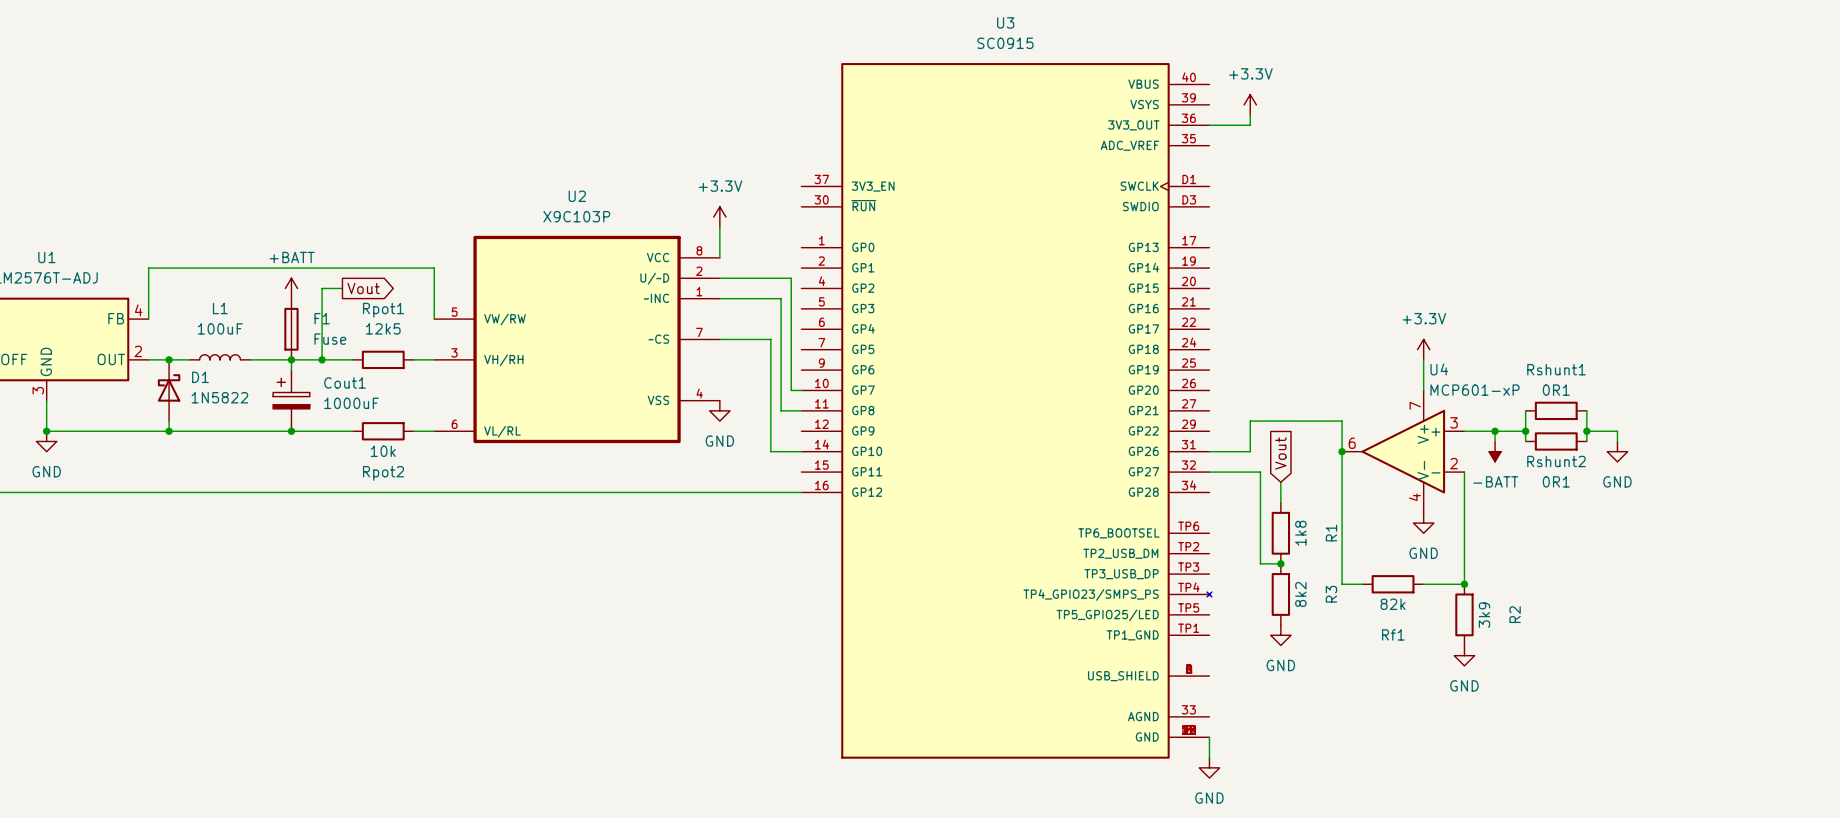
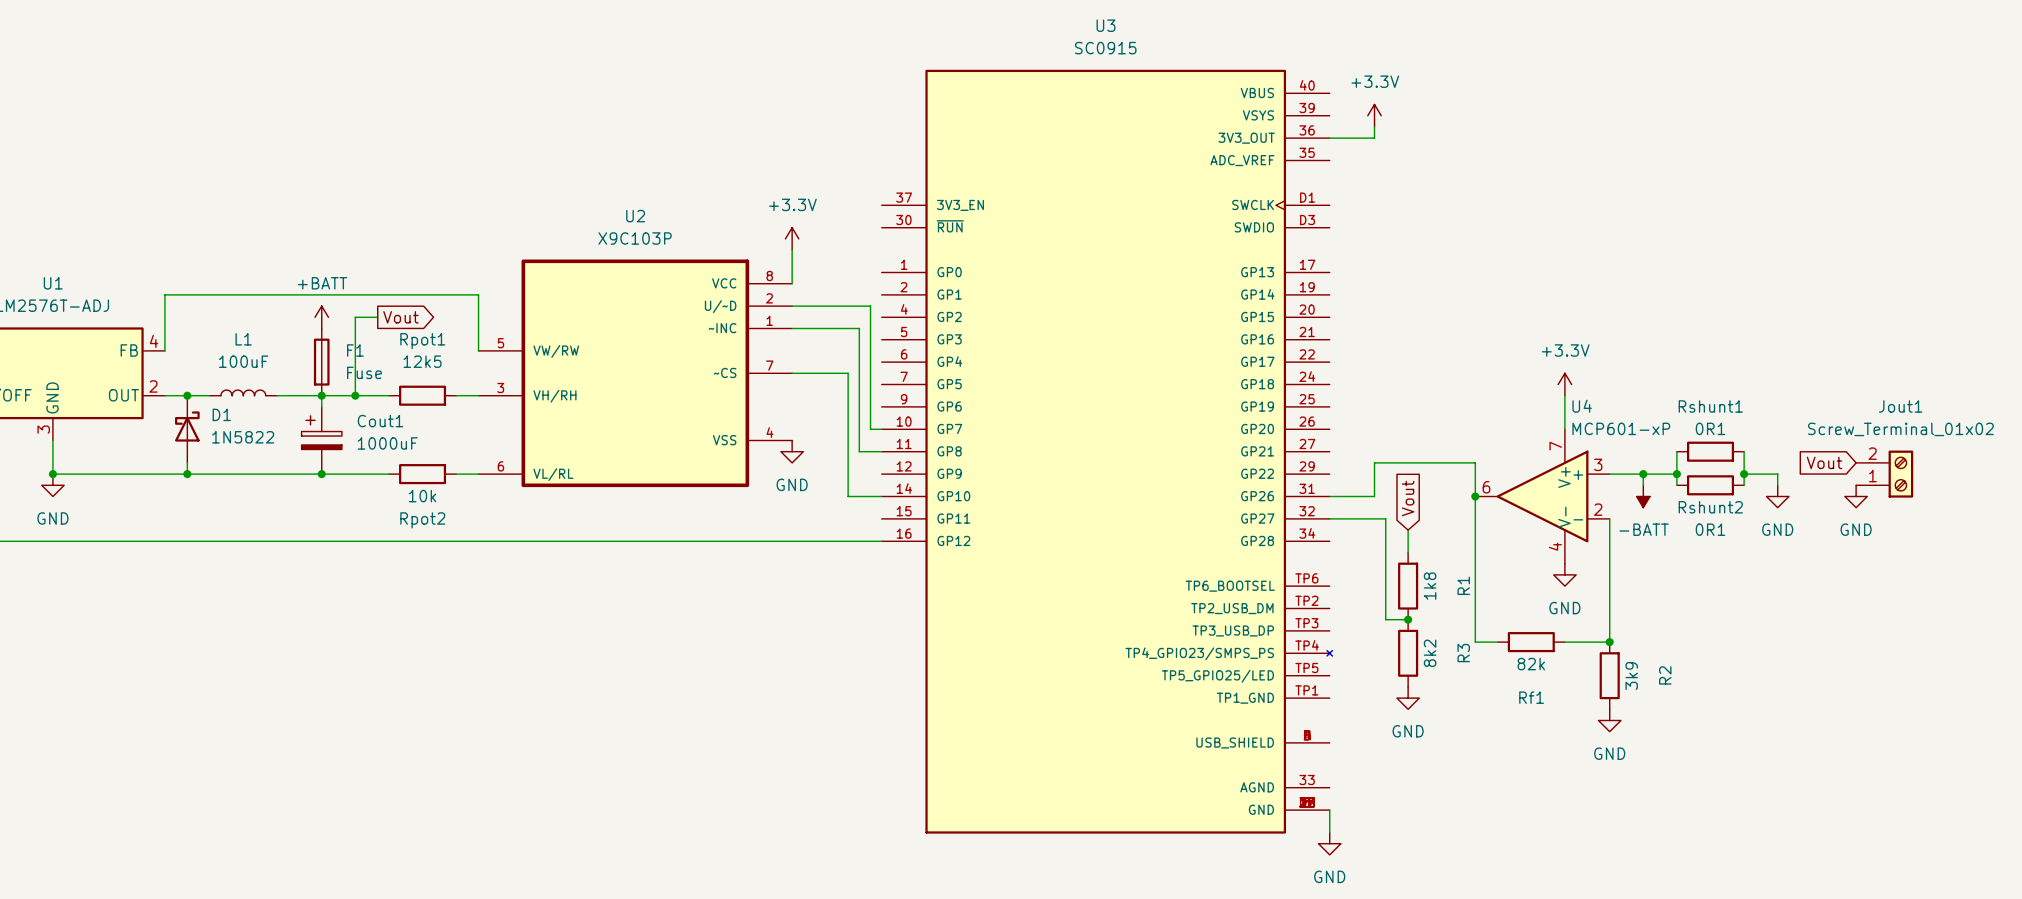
global label: none -> Vout (1824, 462)
Jout1: none -> Screw_Terminal_01x02 (1884, 474)
power symbol: none -> GND (1856, 496)

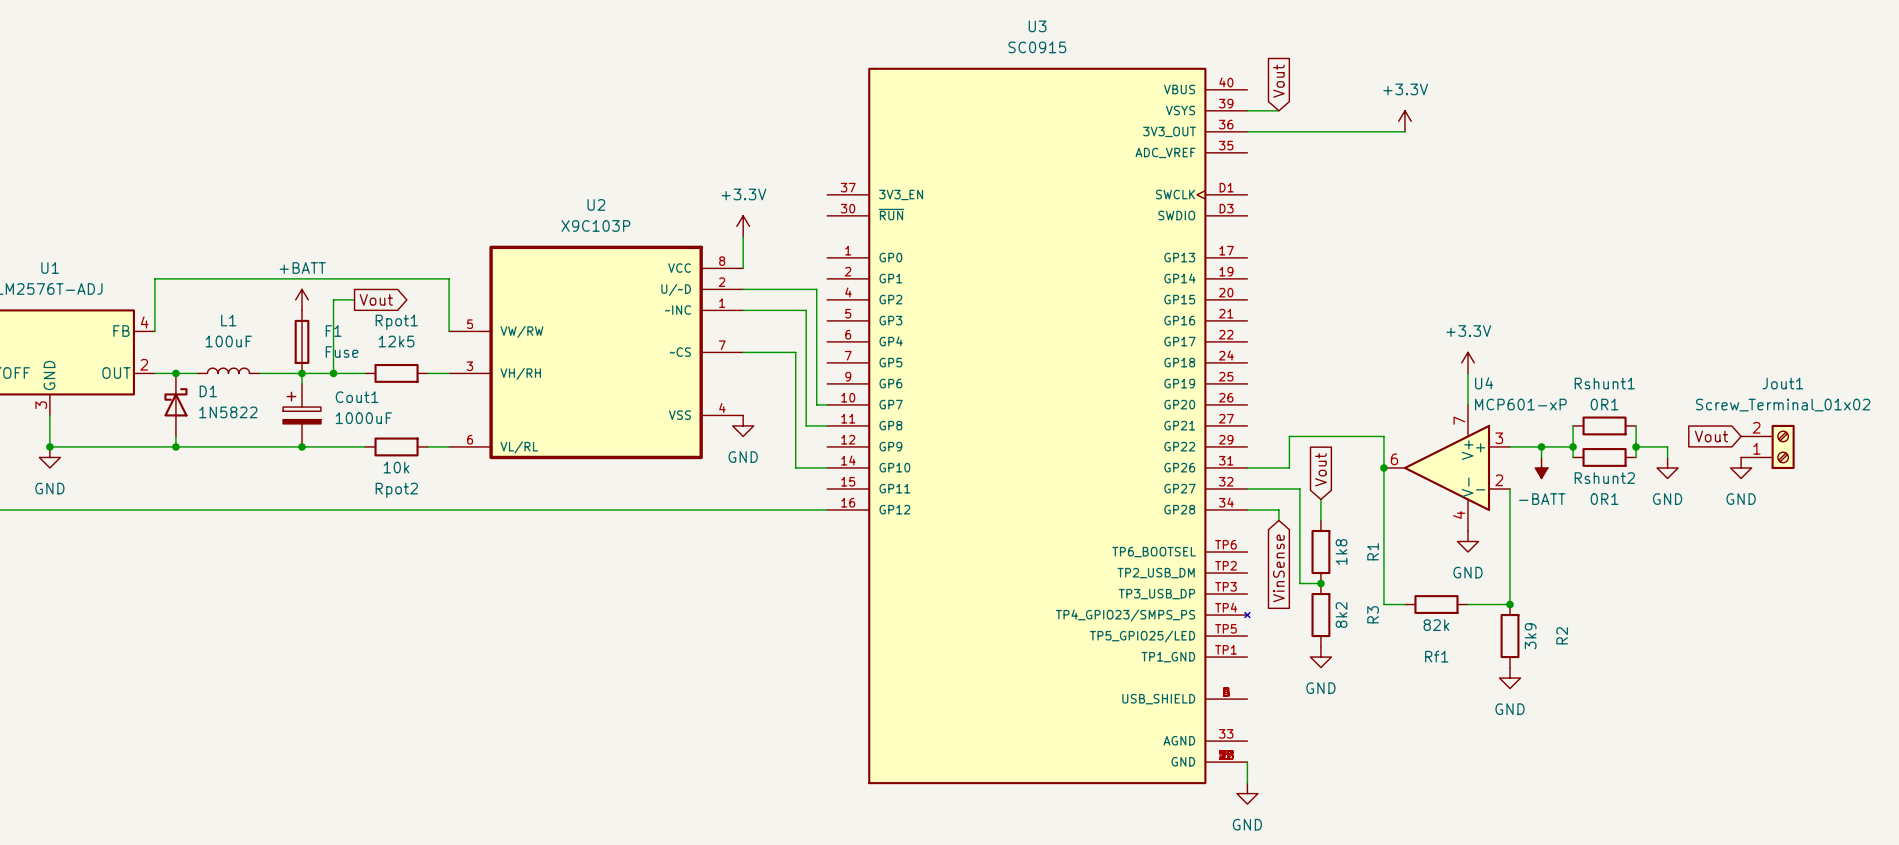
global label: none -> Vout (1278, 81)
wire: none -> (1247, 110) (1278, 110)
power symbol position: +3.3V (1374, 115) -> +3.3V (1404, 121)
wire: (1374, 126) (1374, 138) -> (1404, 131) (1289, 131)
wire: none -> (1247, 509) (1278, 509) (1278, 520)
global label: none -> VinSense (1278, 568)

